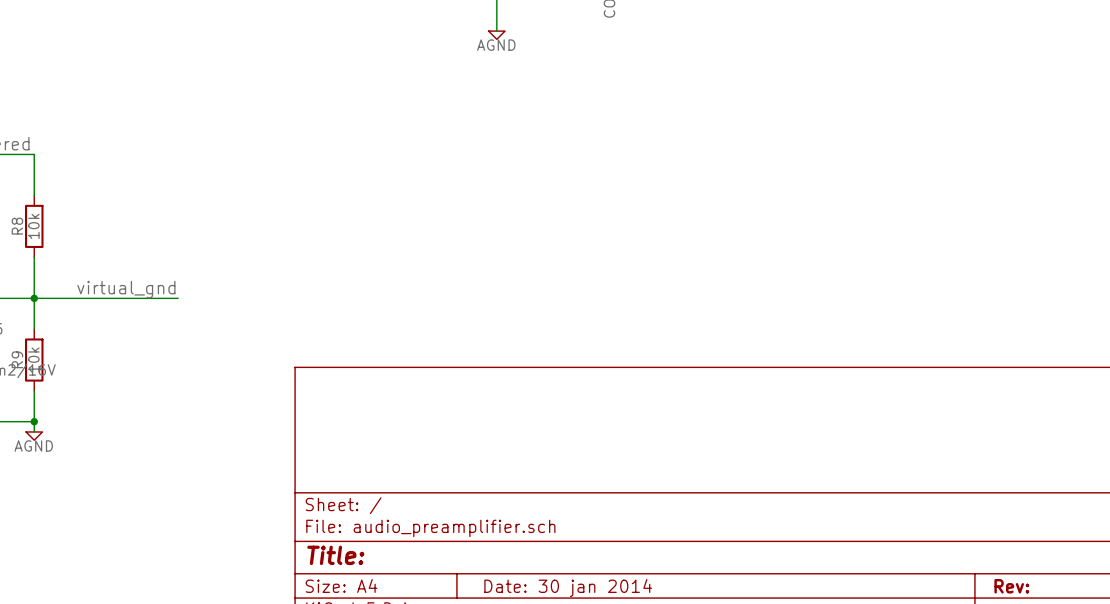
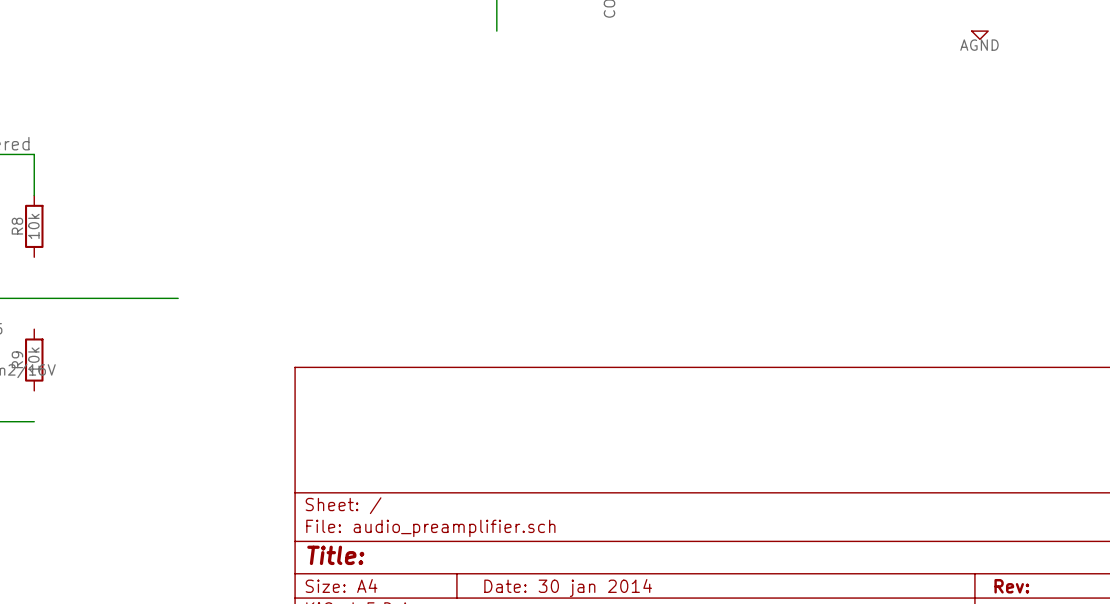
power symbol: AGND (496, 35) -> none
power symbol: none -> AGND (979, 35)
wire: (34, 257) (34, 329) -> none
label: virtual_gnd (126, 289) -> none
junction: (34, 298) -> none
wire: (34, 390) (34, 431) -> none
junction: (34, 421) -> none
power symbol: AGND (34, 436) -> none

